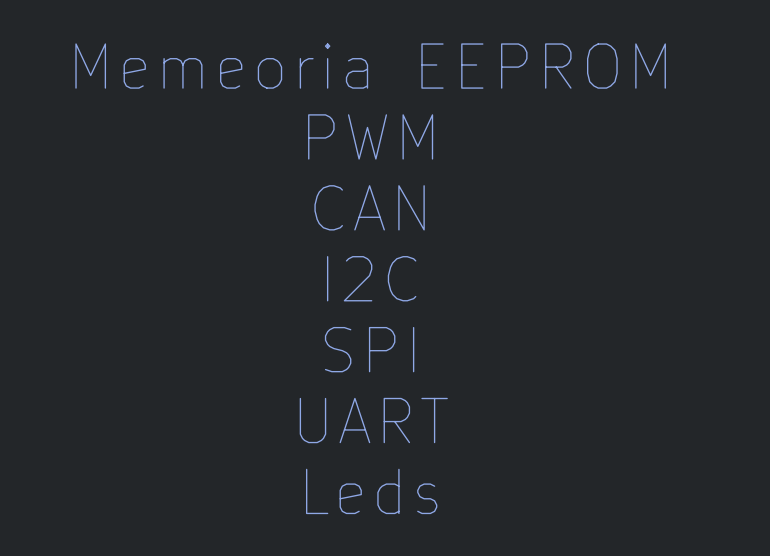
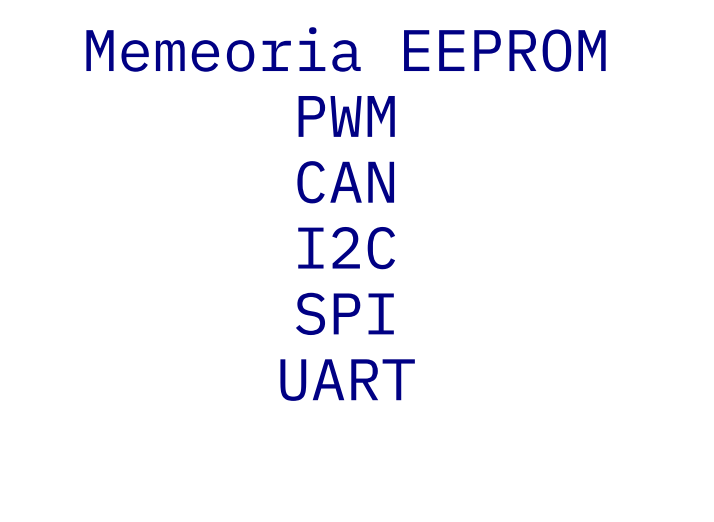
text: Leds (371, 491) -> none

